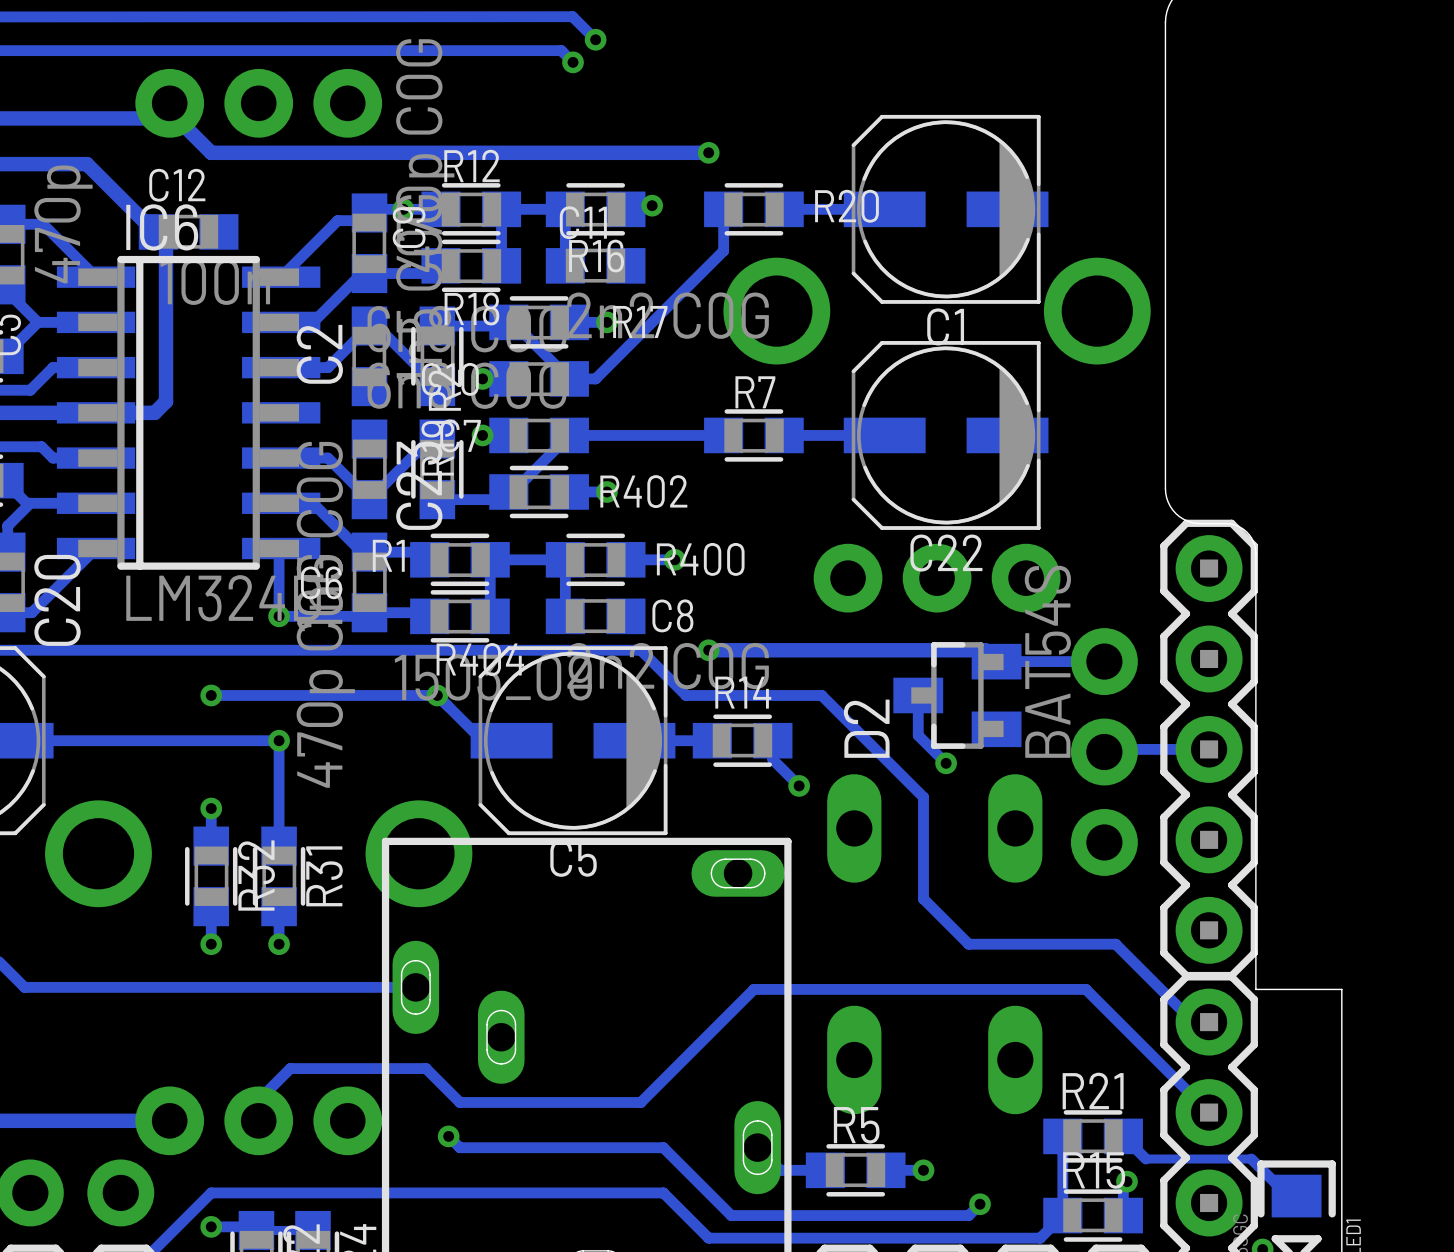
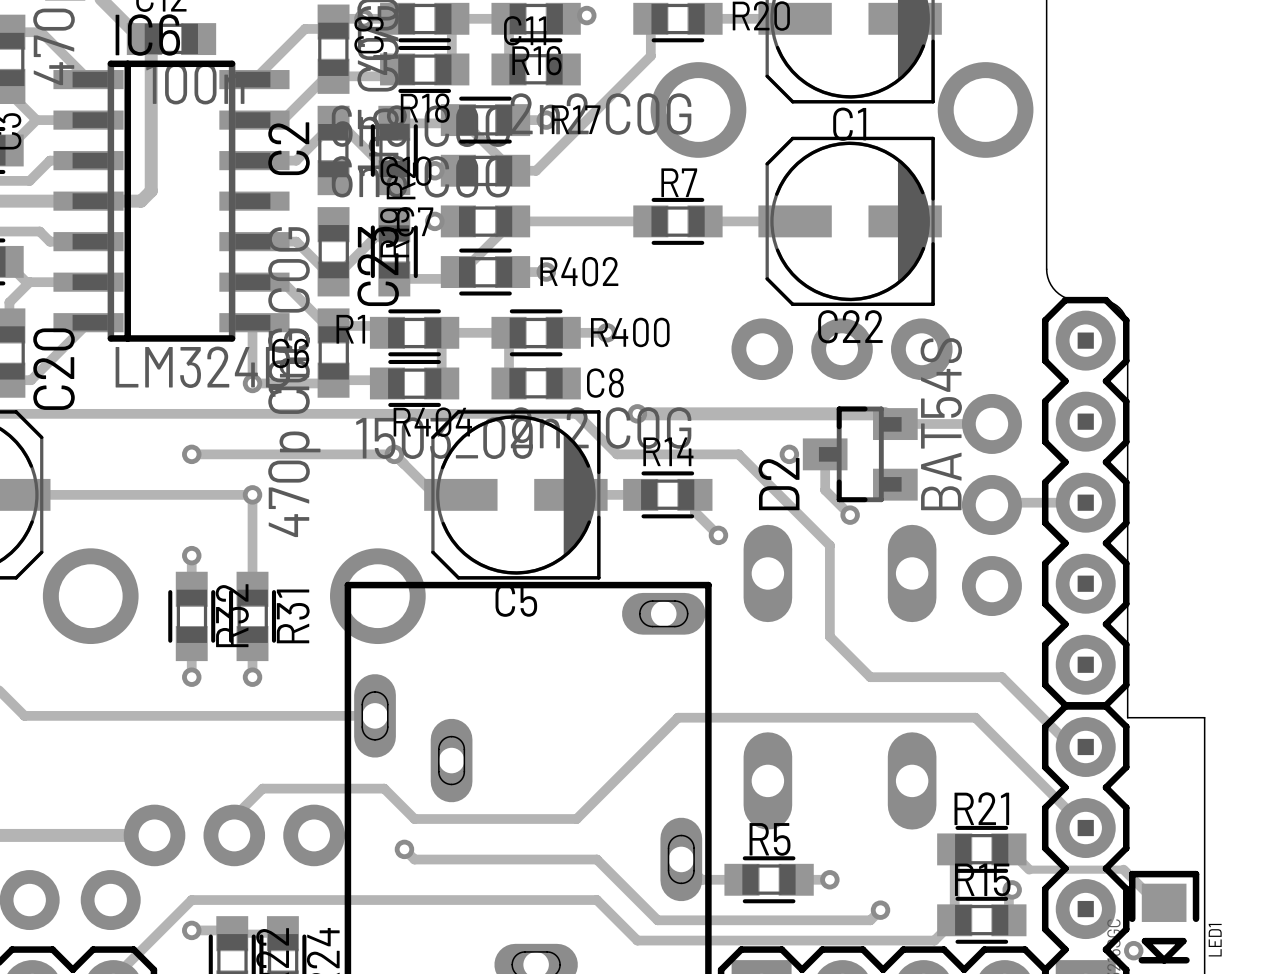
via: none -> (789, 454)

